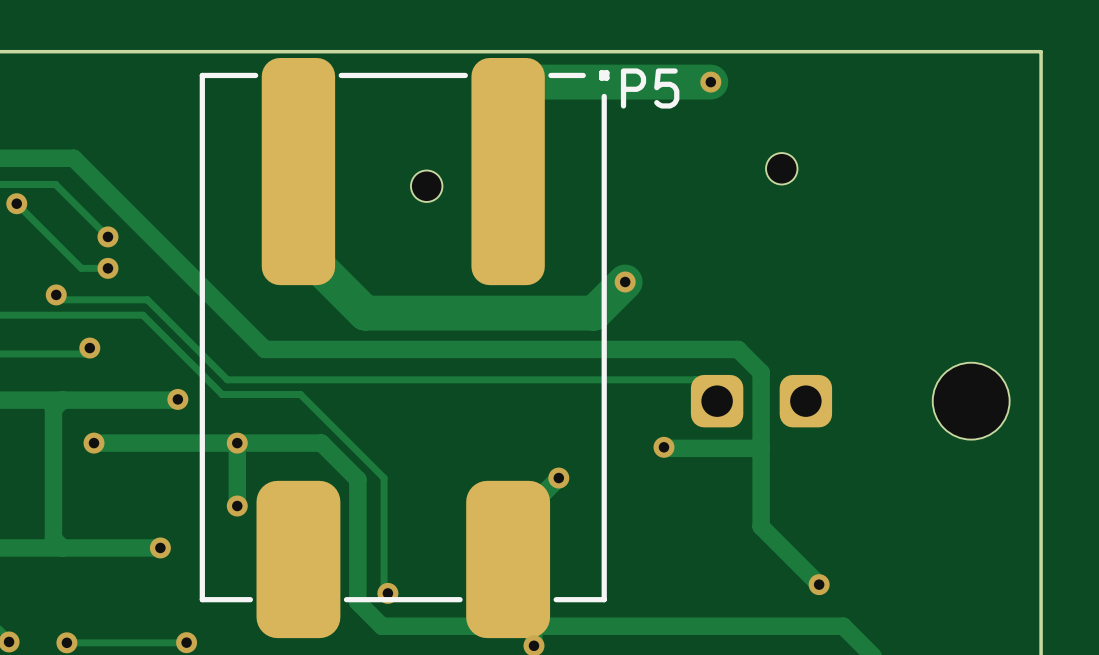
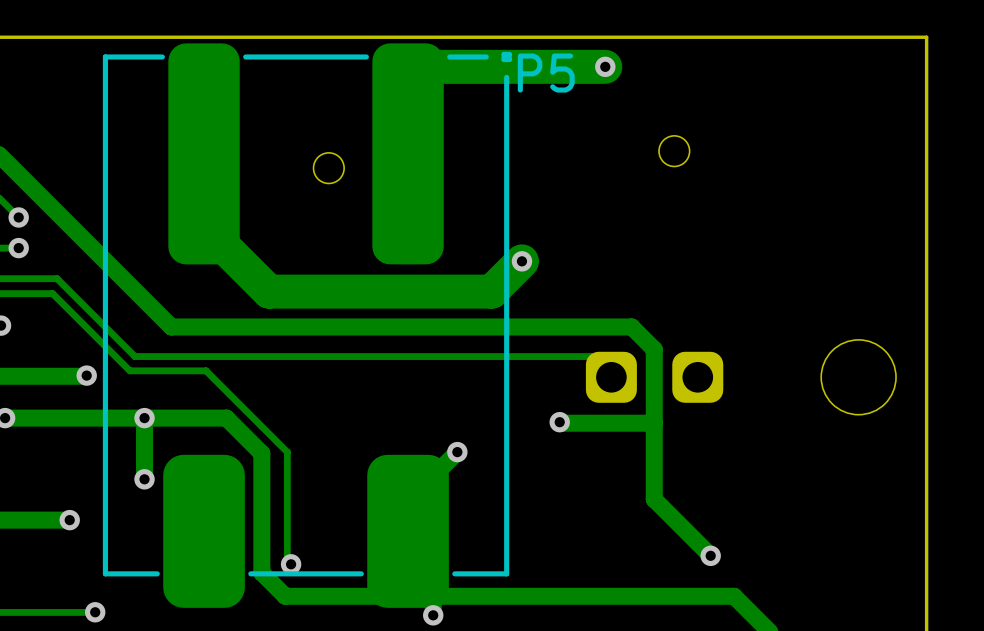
P5 footprint: [199, 57, 610, 639] -> [102, 43, 512, 608]

